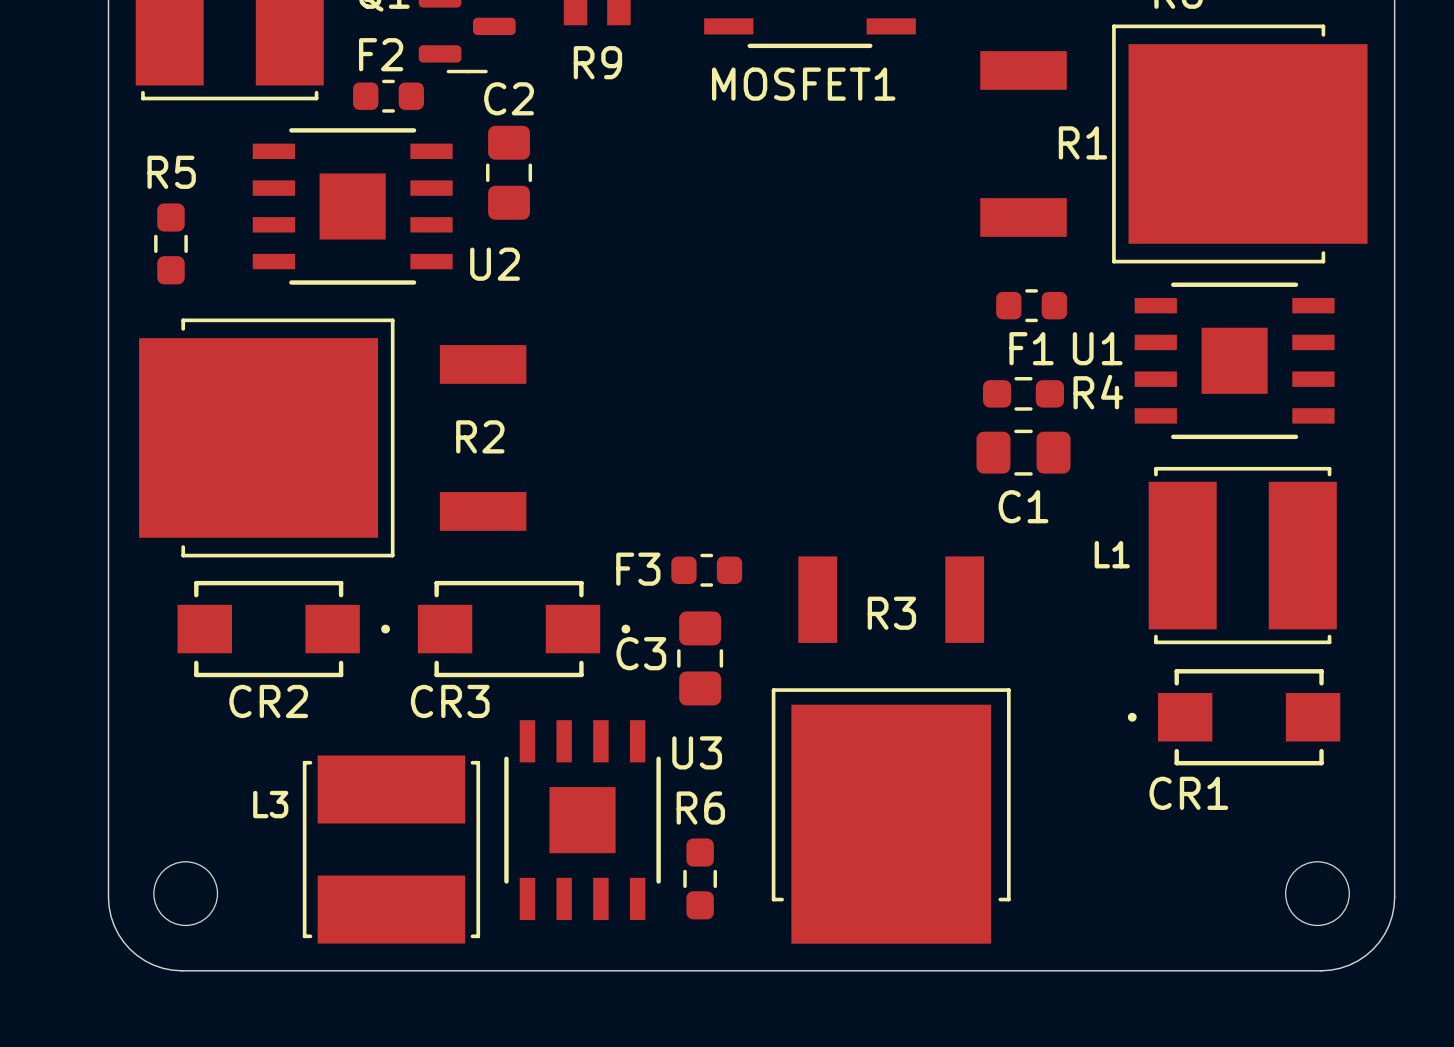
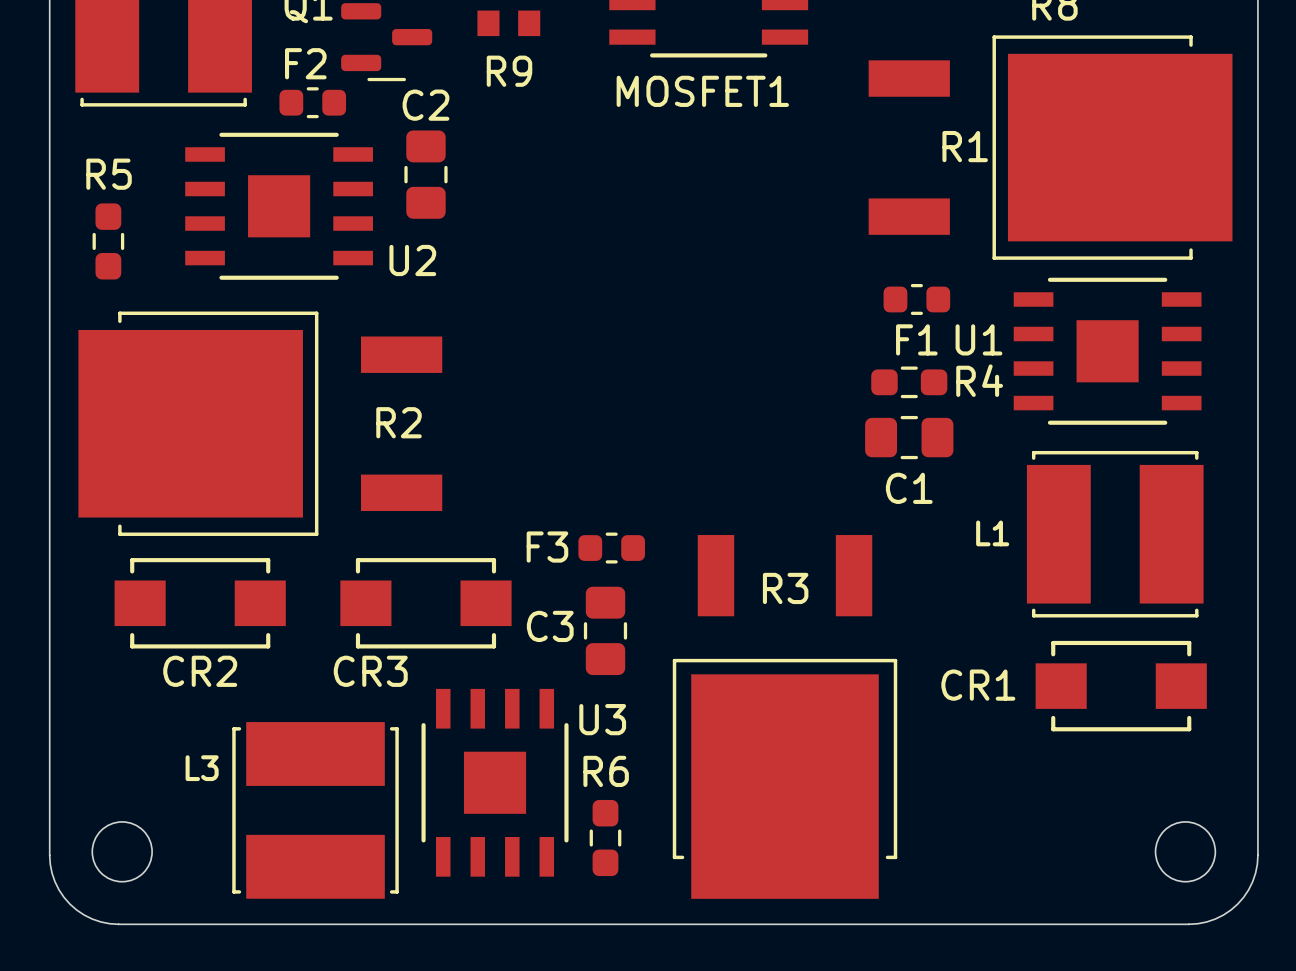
CR2 footprint: [177, 580, 390, 678] -> [114, 558, 286, 649]
CR3 footprint: [417, 580, 631, 678] -> [340, 558, 512, 649]
CR1 footprint: [1127, 669, 1341, 766] -> [1035, 640, 1207, 732]
CR1 name position: CR1 (1188, 793) -> CR1 (978, 685)

